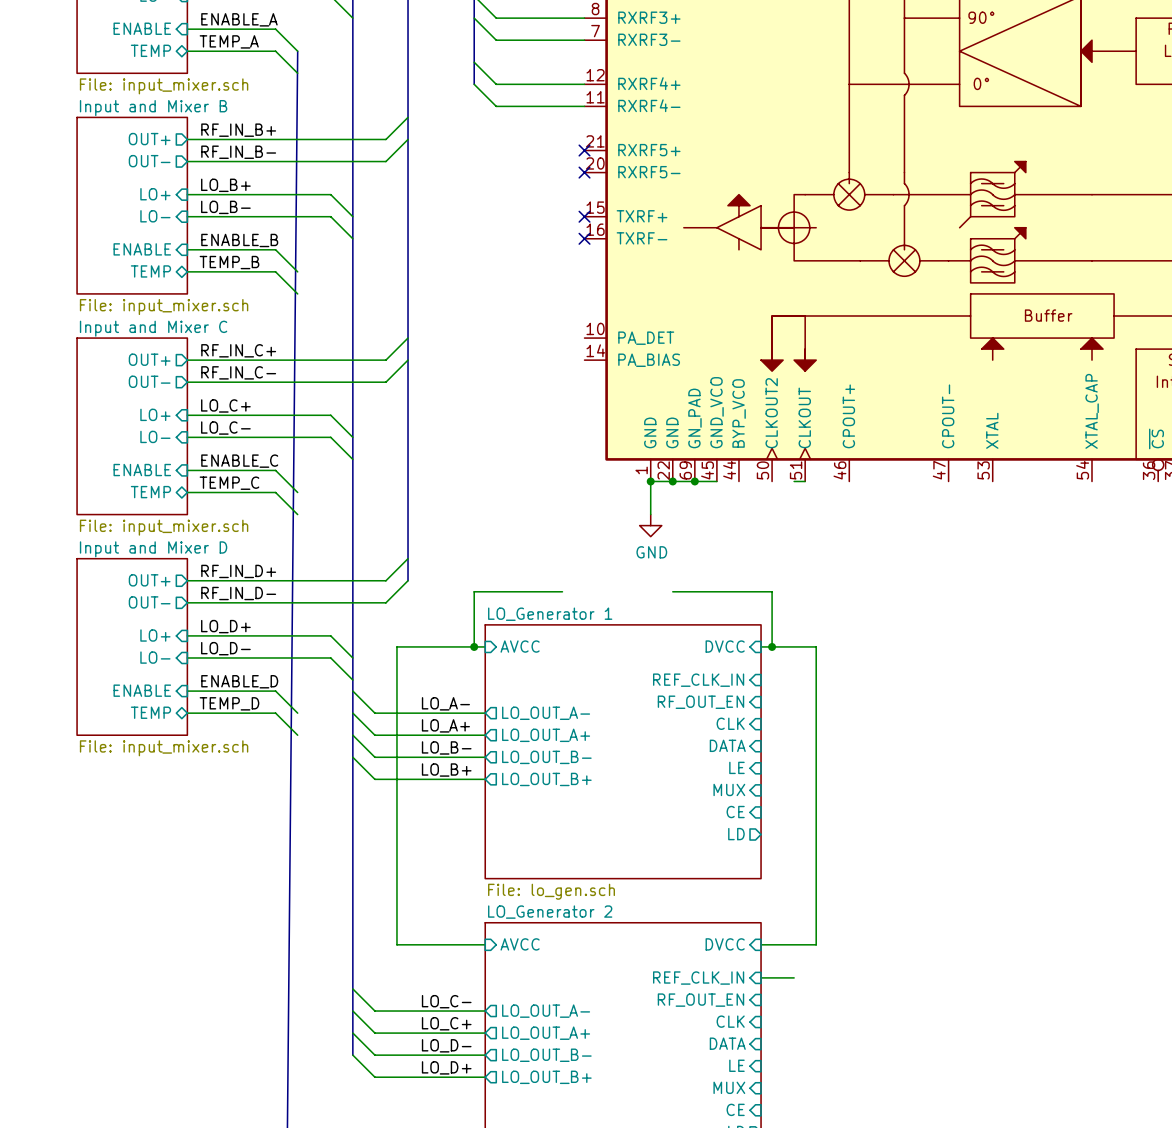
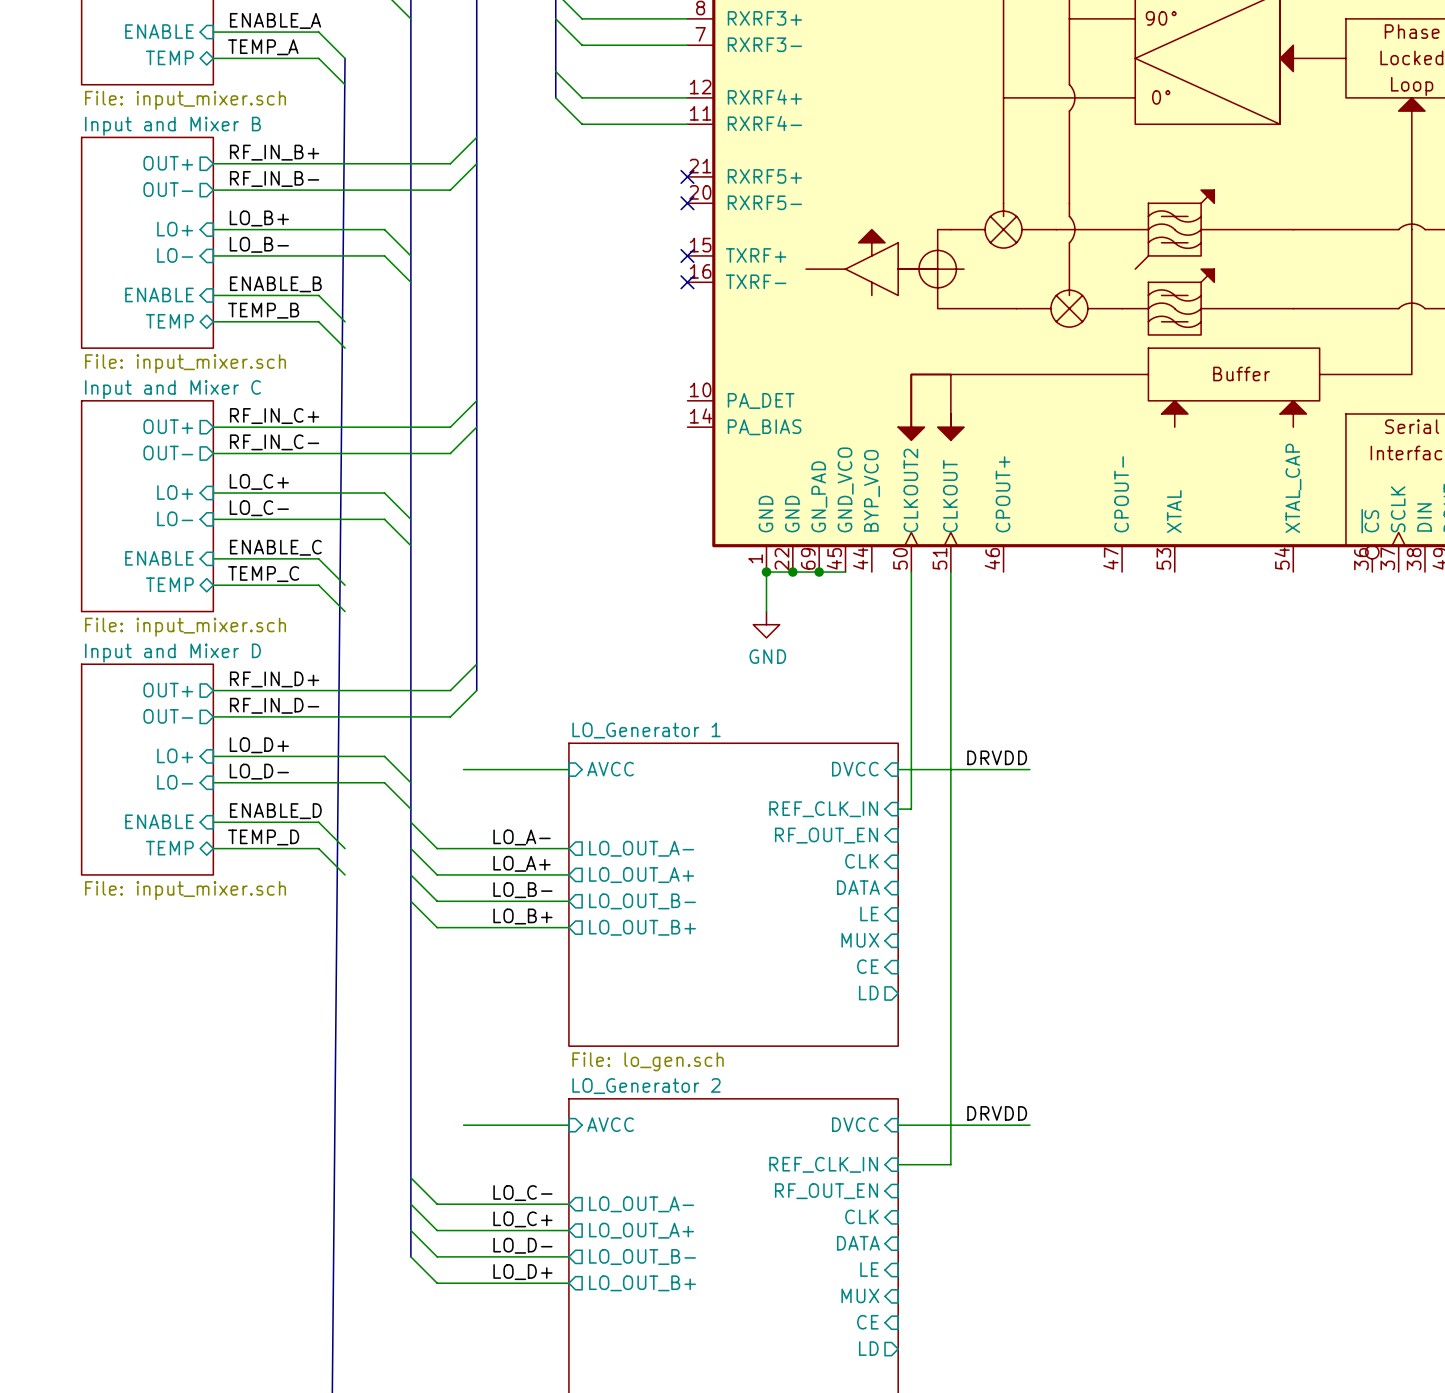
wire: (794, 481) (805, 481) -> (937, 1164) (950, 1164) (950, 572)
wire: (562, 591) (474, 591) (474, 646) -> none
wire: (672, 591) (772, 591) -> (911, 572) (911, 703)
label: none -> DRVDD (997, 757)
wire: (396, 646) (396, 944) -> none
junction: (474, 646) -> none
wire: none -> (911, 769) (911, 809) (898, 809)
junction: (772, 646) -> none
wire: (816, 646) (816, 944) -> (964, 769) (1029, 769)
label: none -> DRVDD (997, 1113)
wire: none -> (964, 1125) (1029, 1125)

